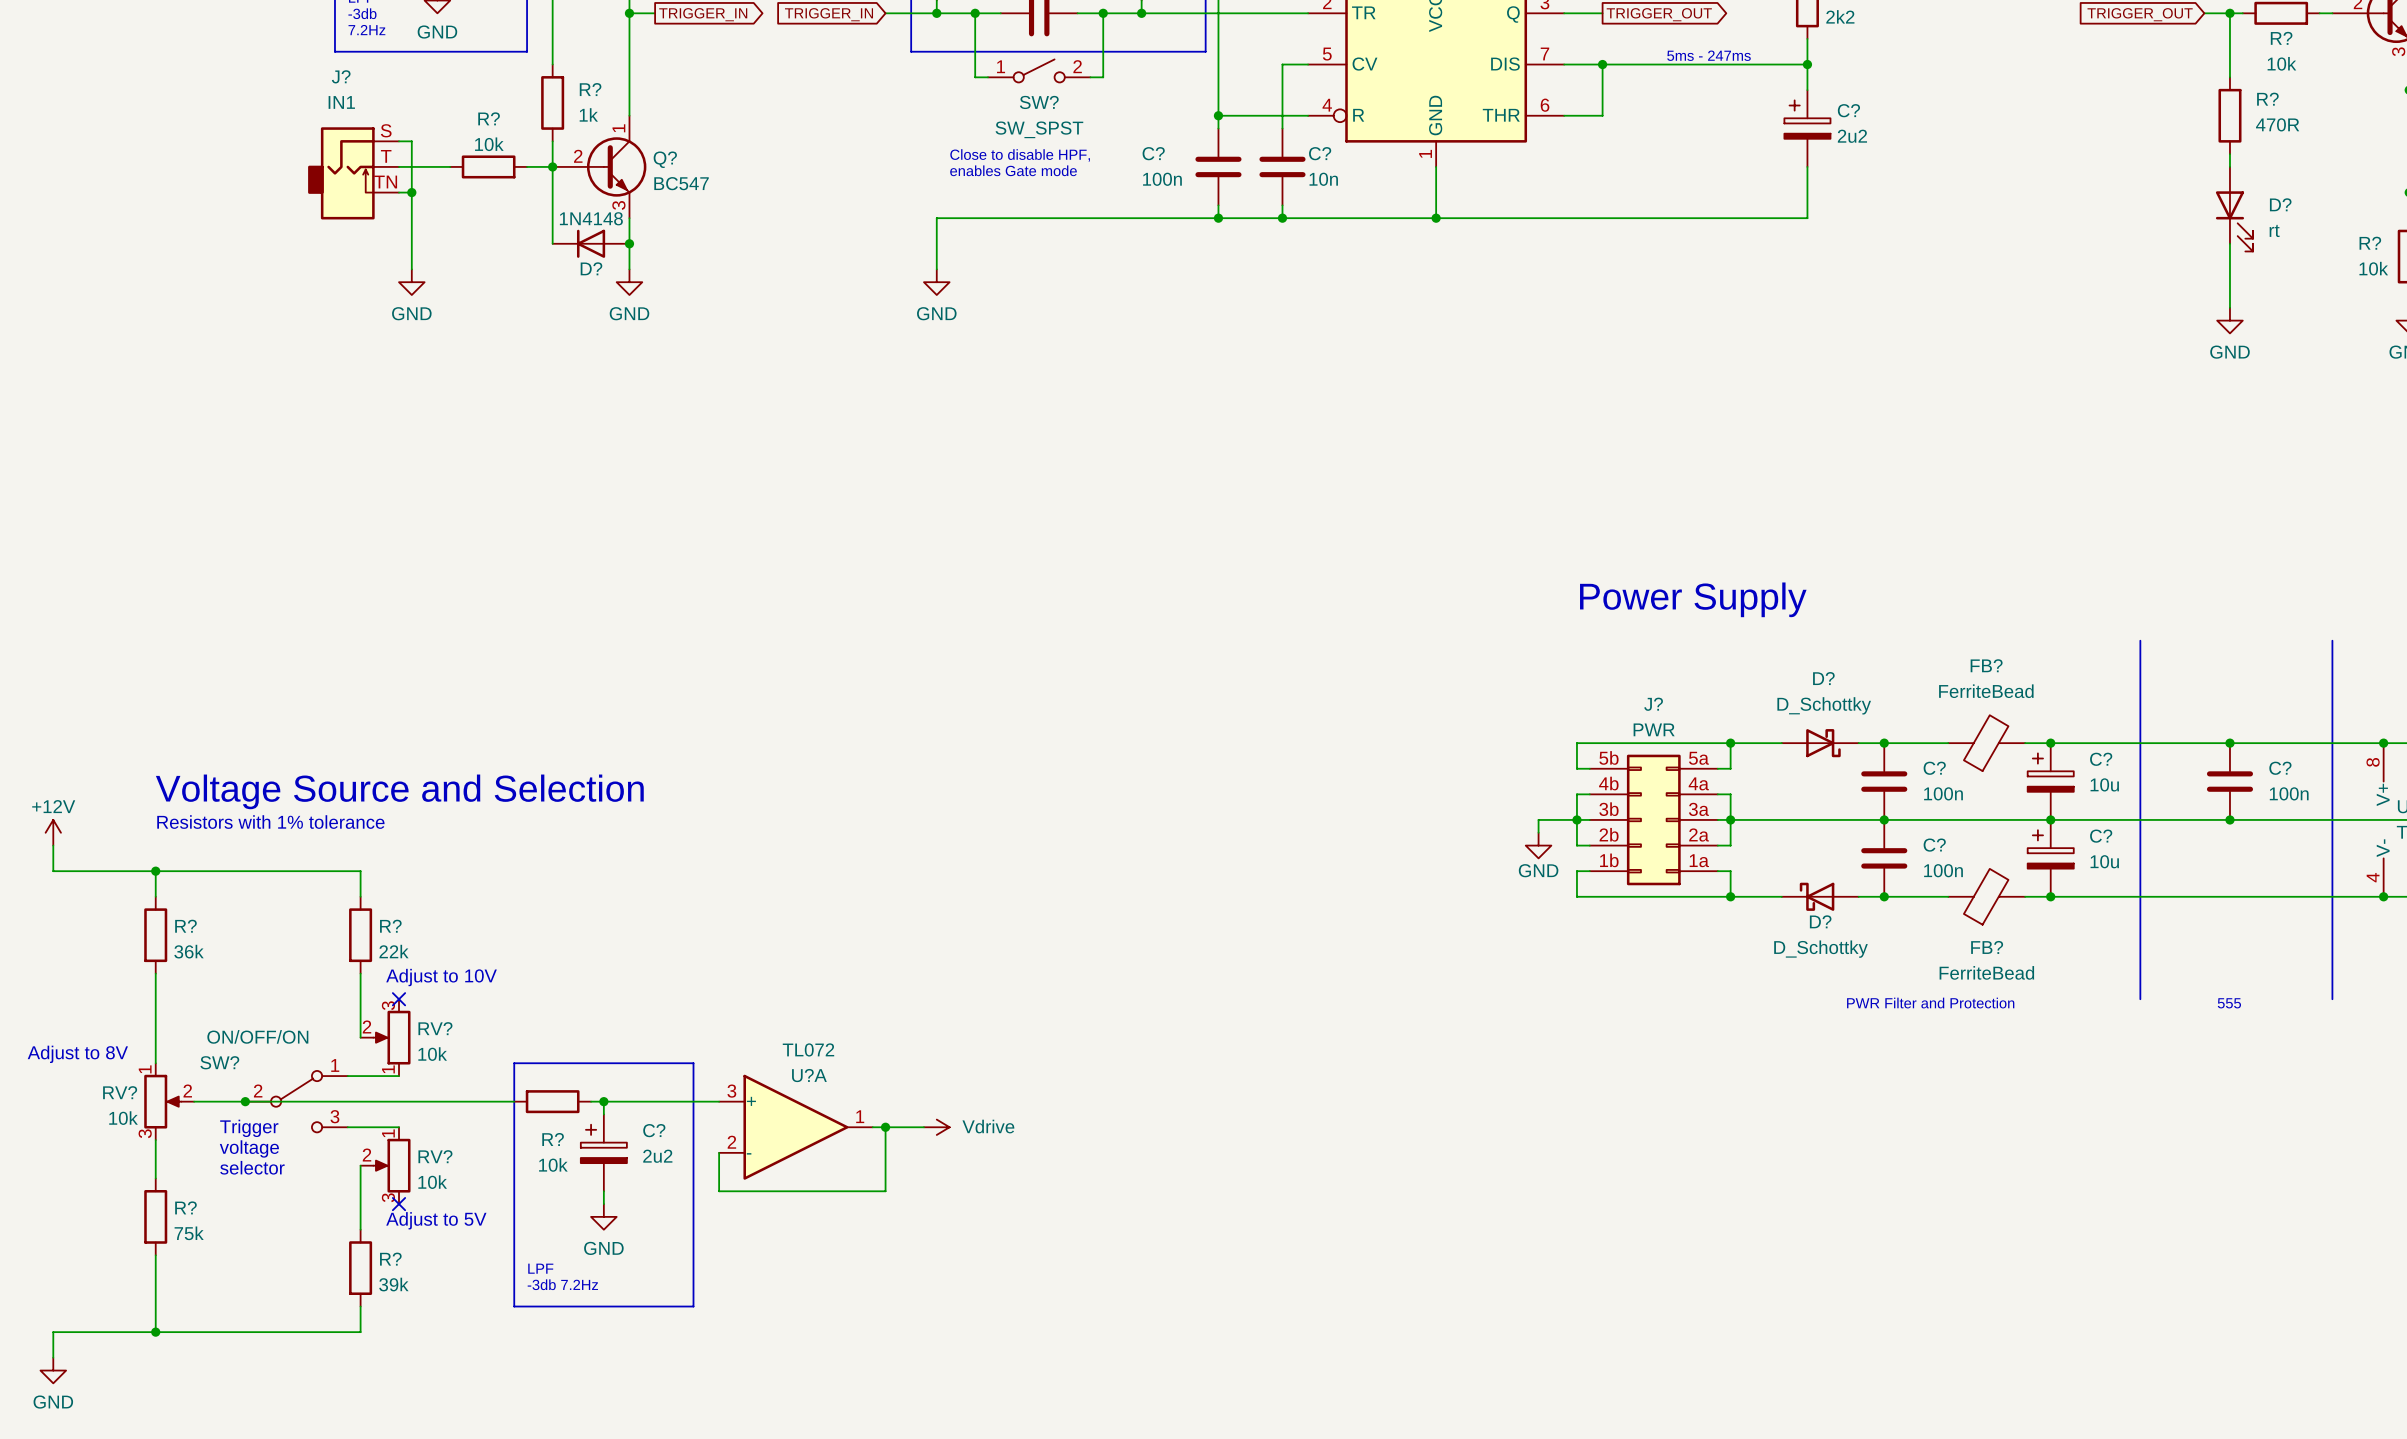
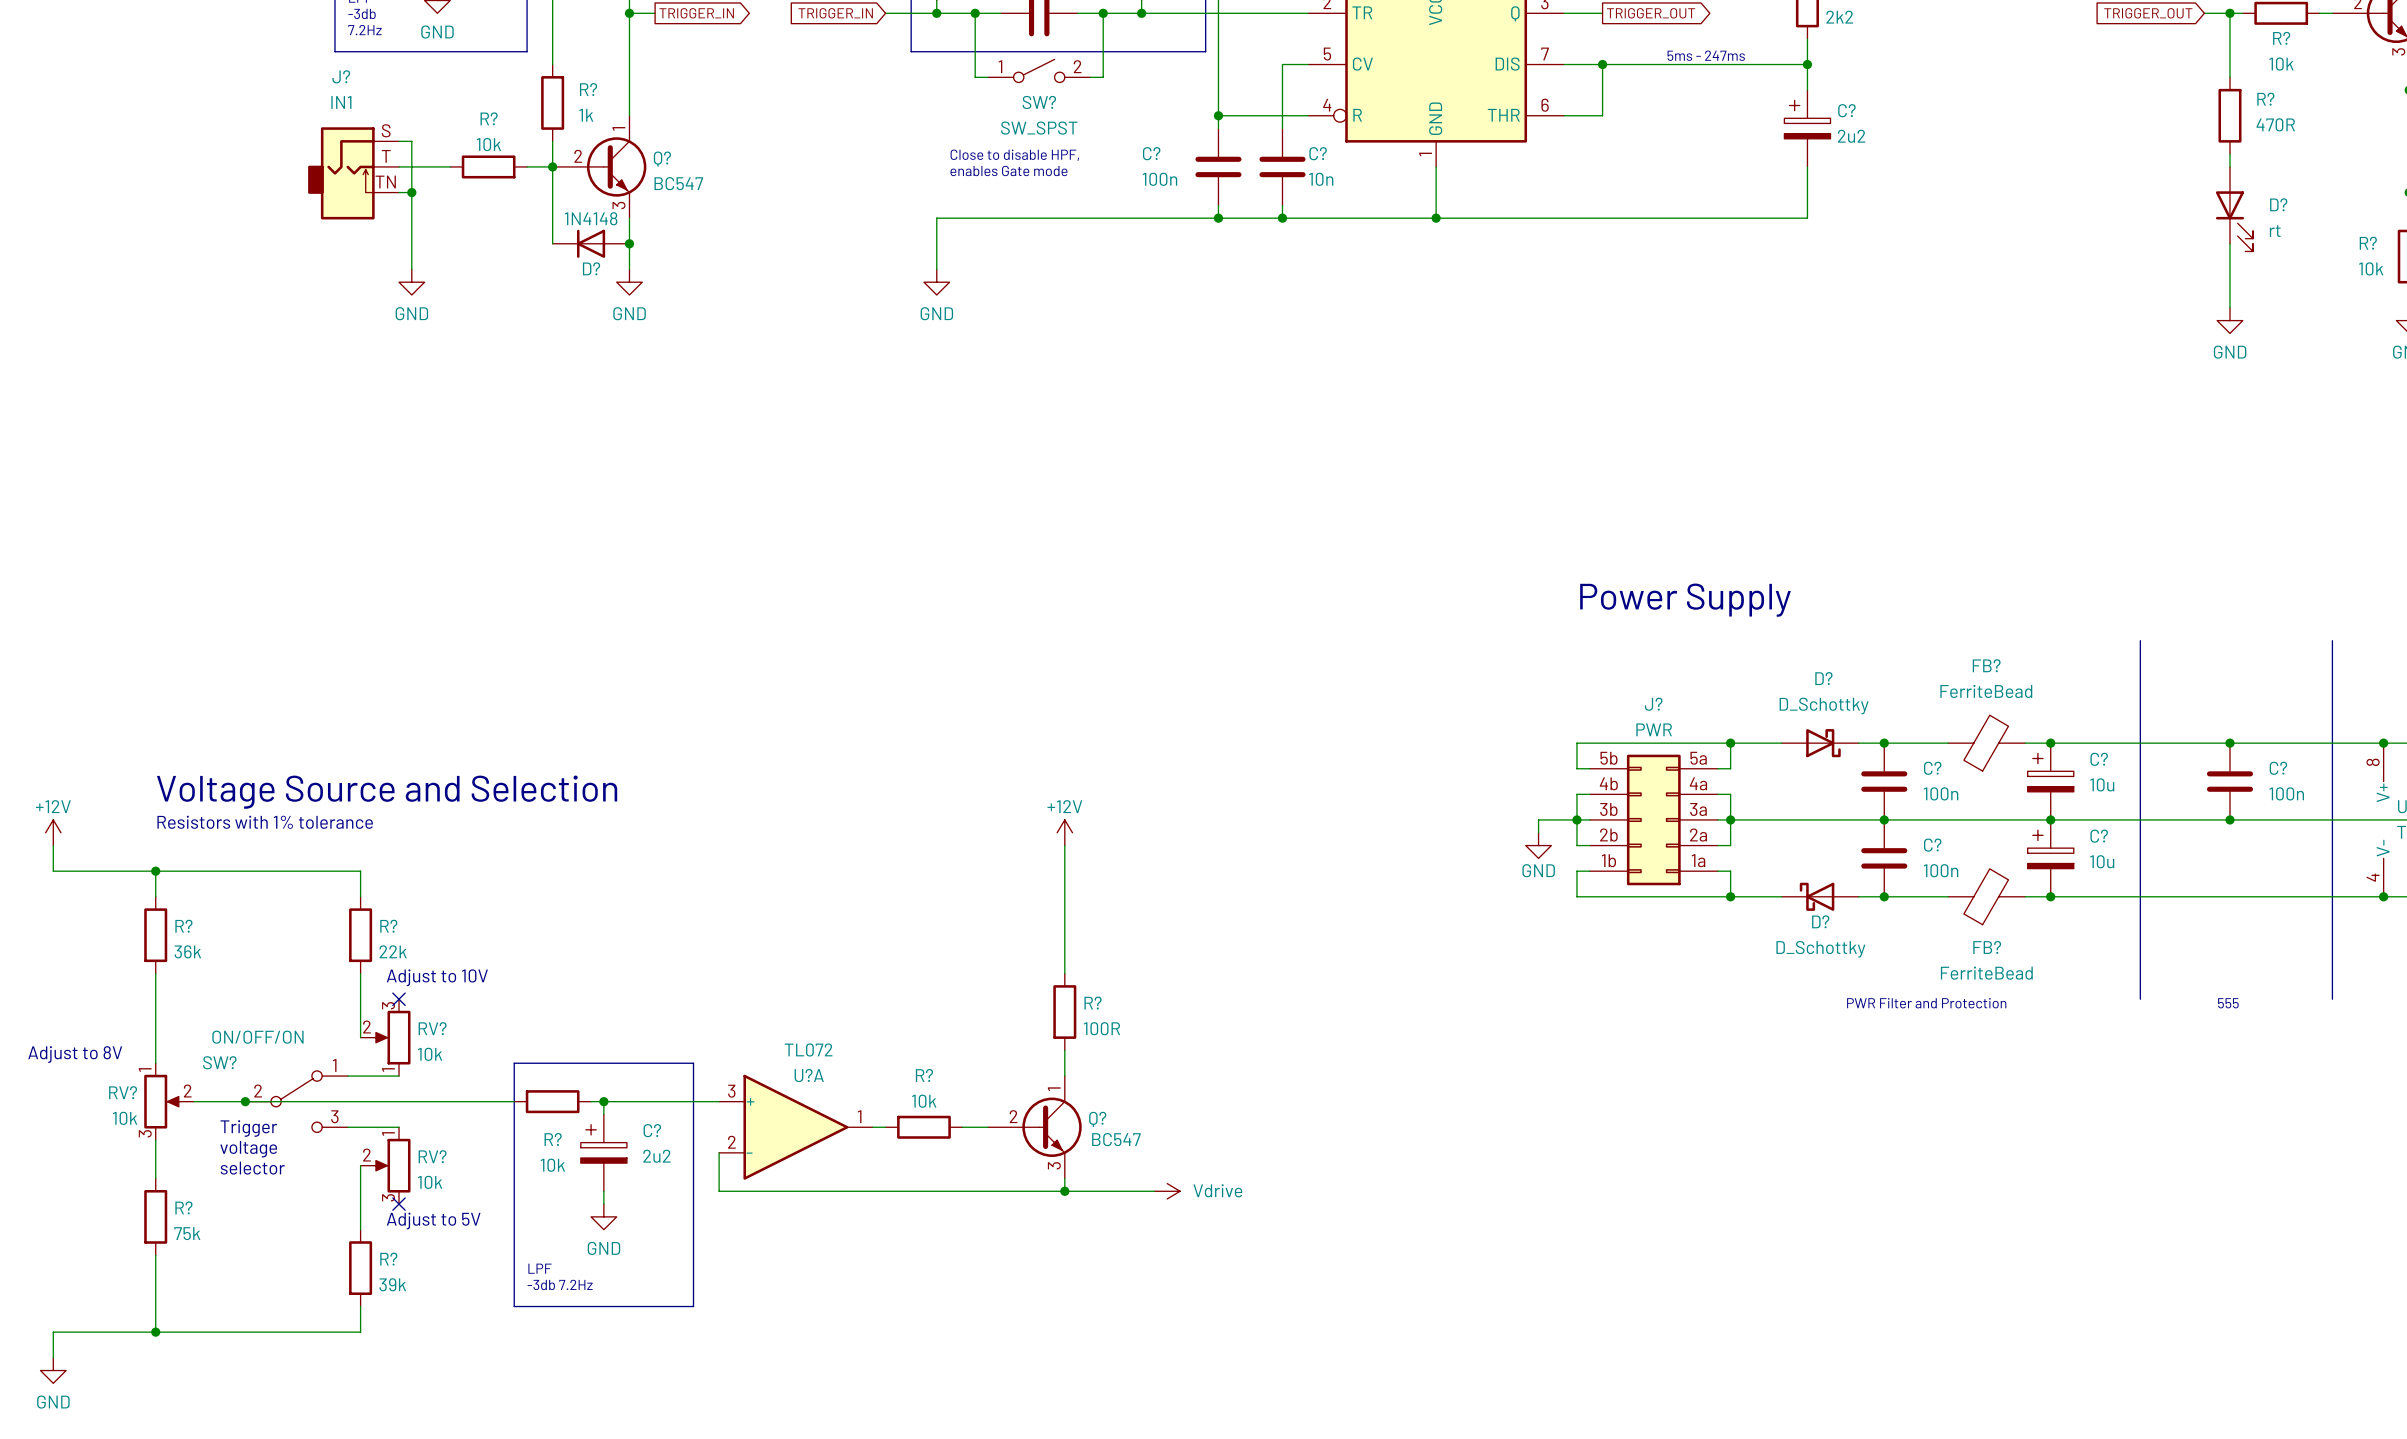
power symbol: none -> +12V (1064, 832)
wire: none -> (1064, 845) (1064, 973)
R?: none -> 100R (1064, 1012)
wire: none -> (1064, 1050) (1064, 1076)
junction: (885, 1127) -> none
wire: (923, 1127) (885, 1127) (885, 1191) -> (1154, 1191) (885, 1191)
R?: none -> 10k (923, 1127)
power symbol position: Vdrive (936, 1127) -> Vdrive (1167, 1191)
wire: none -> (962, 1127) (987, 1127)
Q?: none -> BC547 (1034, 1127)
wire: none -> (1064, 1178) (1064, 1191)
junction: none -> (1064, 1191)

